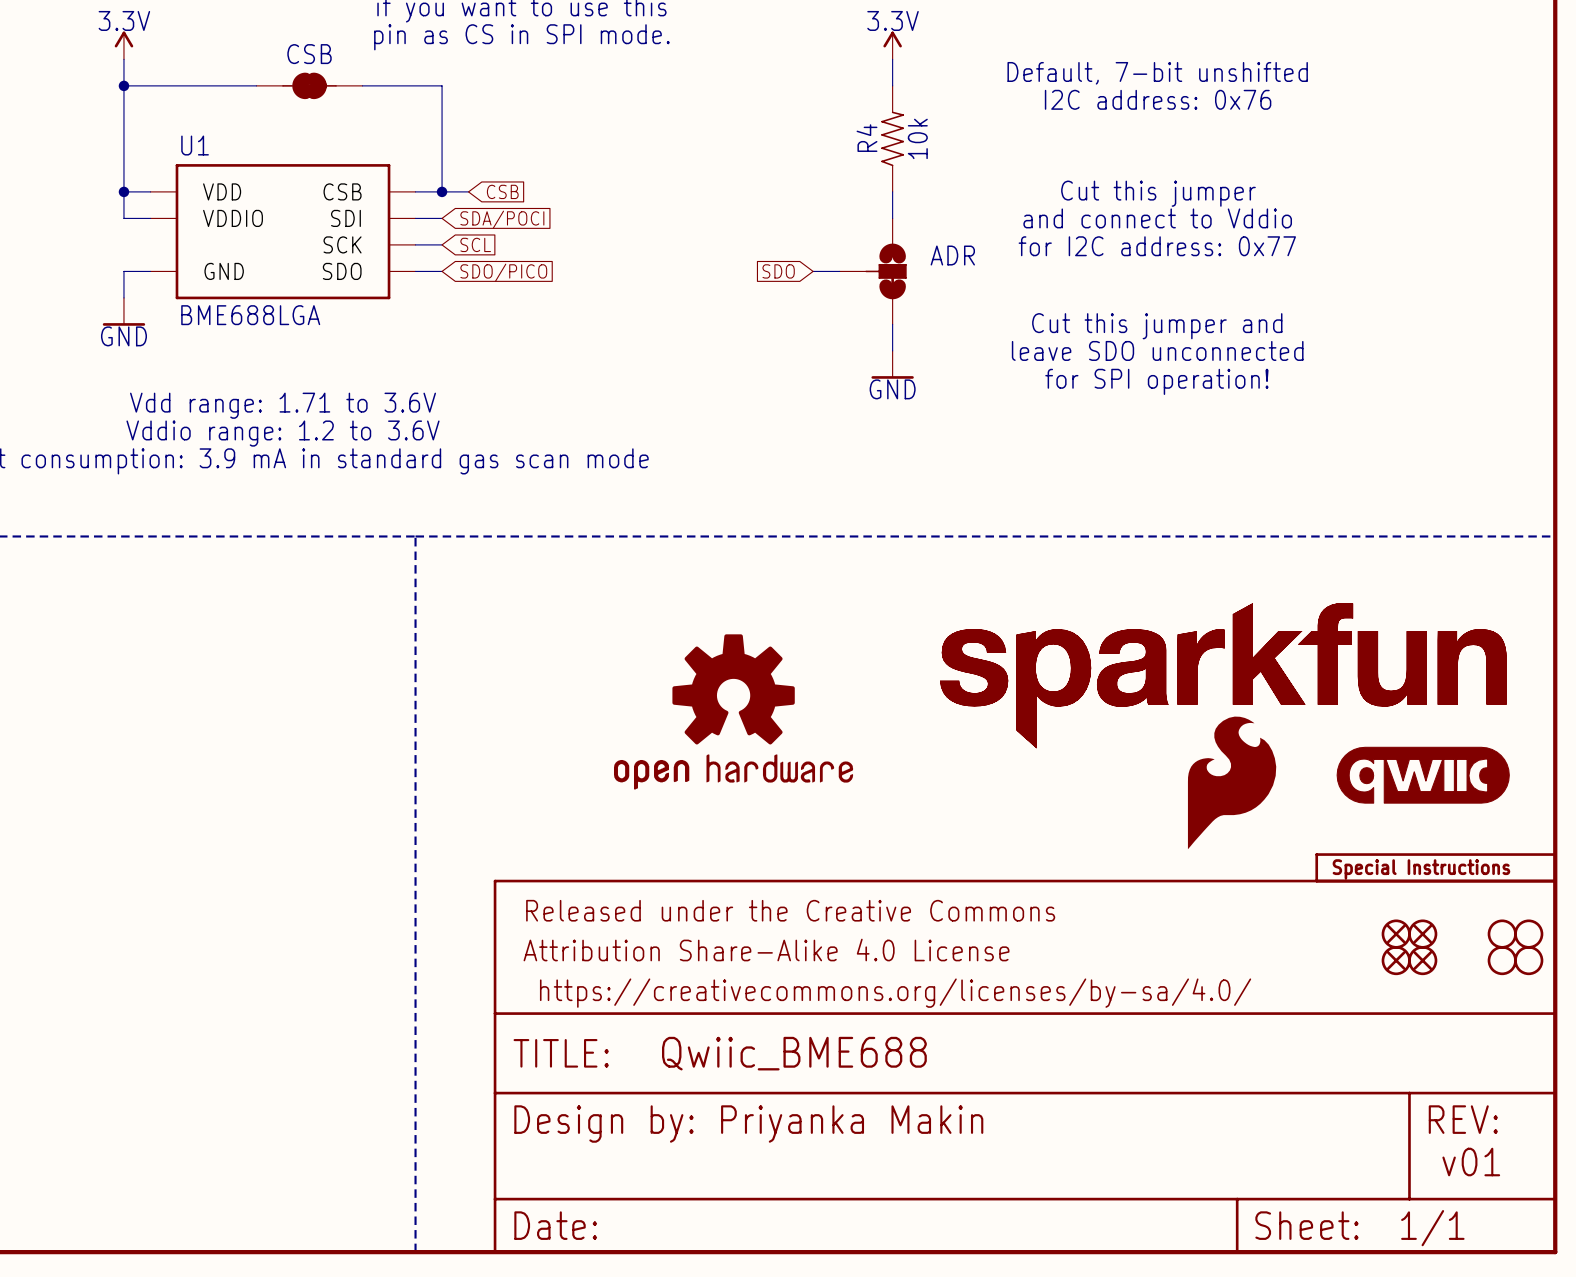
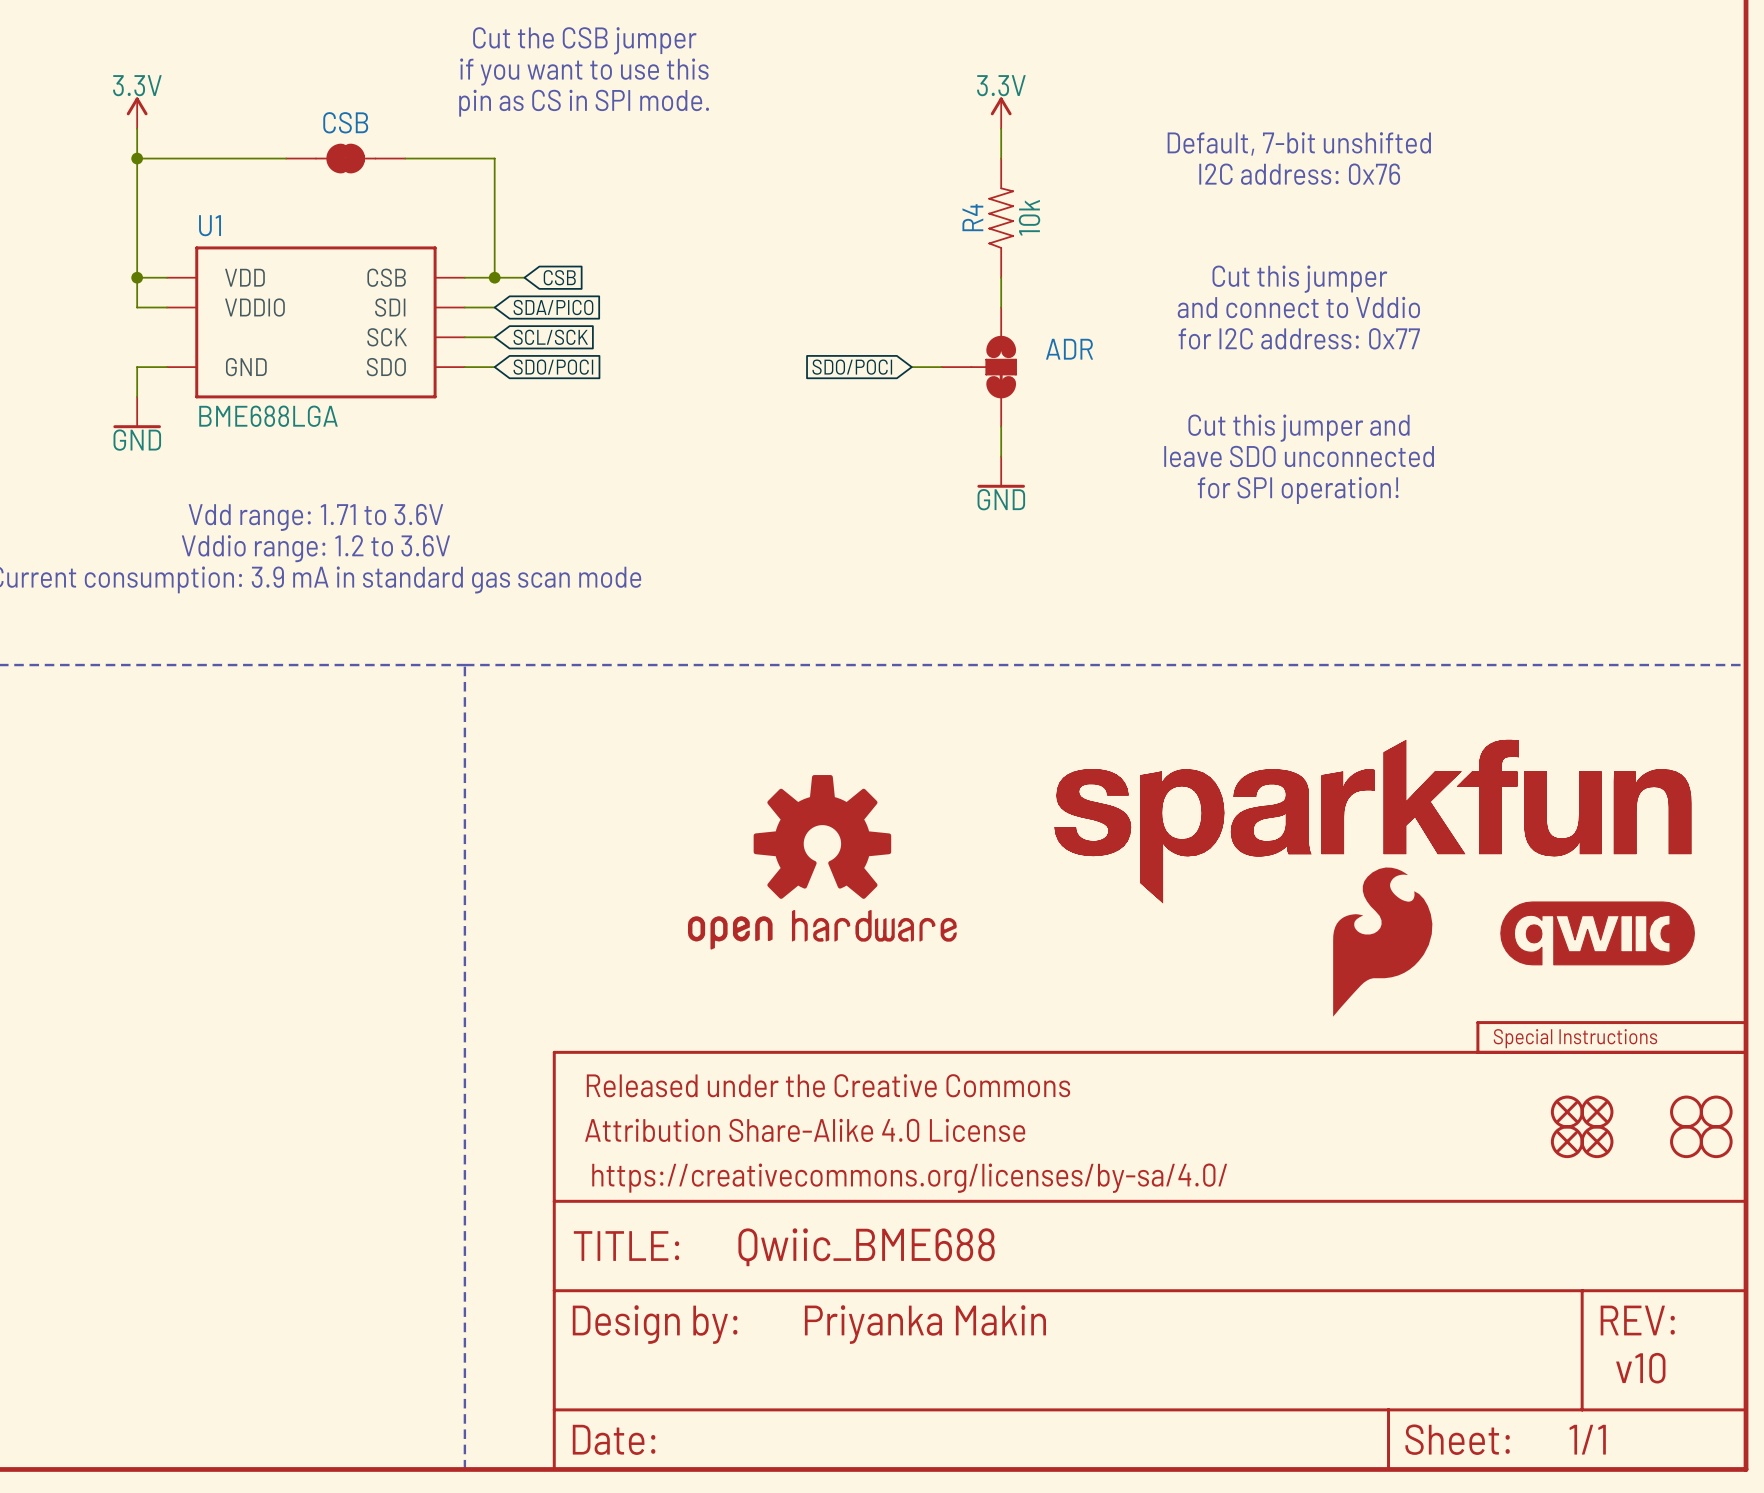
global label: SDA/POCI (502, 219) -> SDA/PICO (553, 307)
global label: SCL (475, 244) -> SCL/SCK (550, 337)
global label: SDO (778, 271) -> SDO/POCI (852, 367)
global label: SDO/PICO (503, 272) -> SDO/POCI (553, 367)
text: v01 (1471, 1162) -> v10 (1640, 1368)

